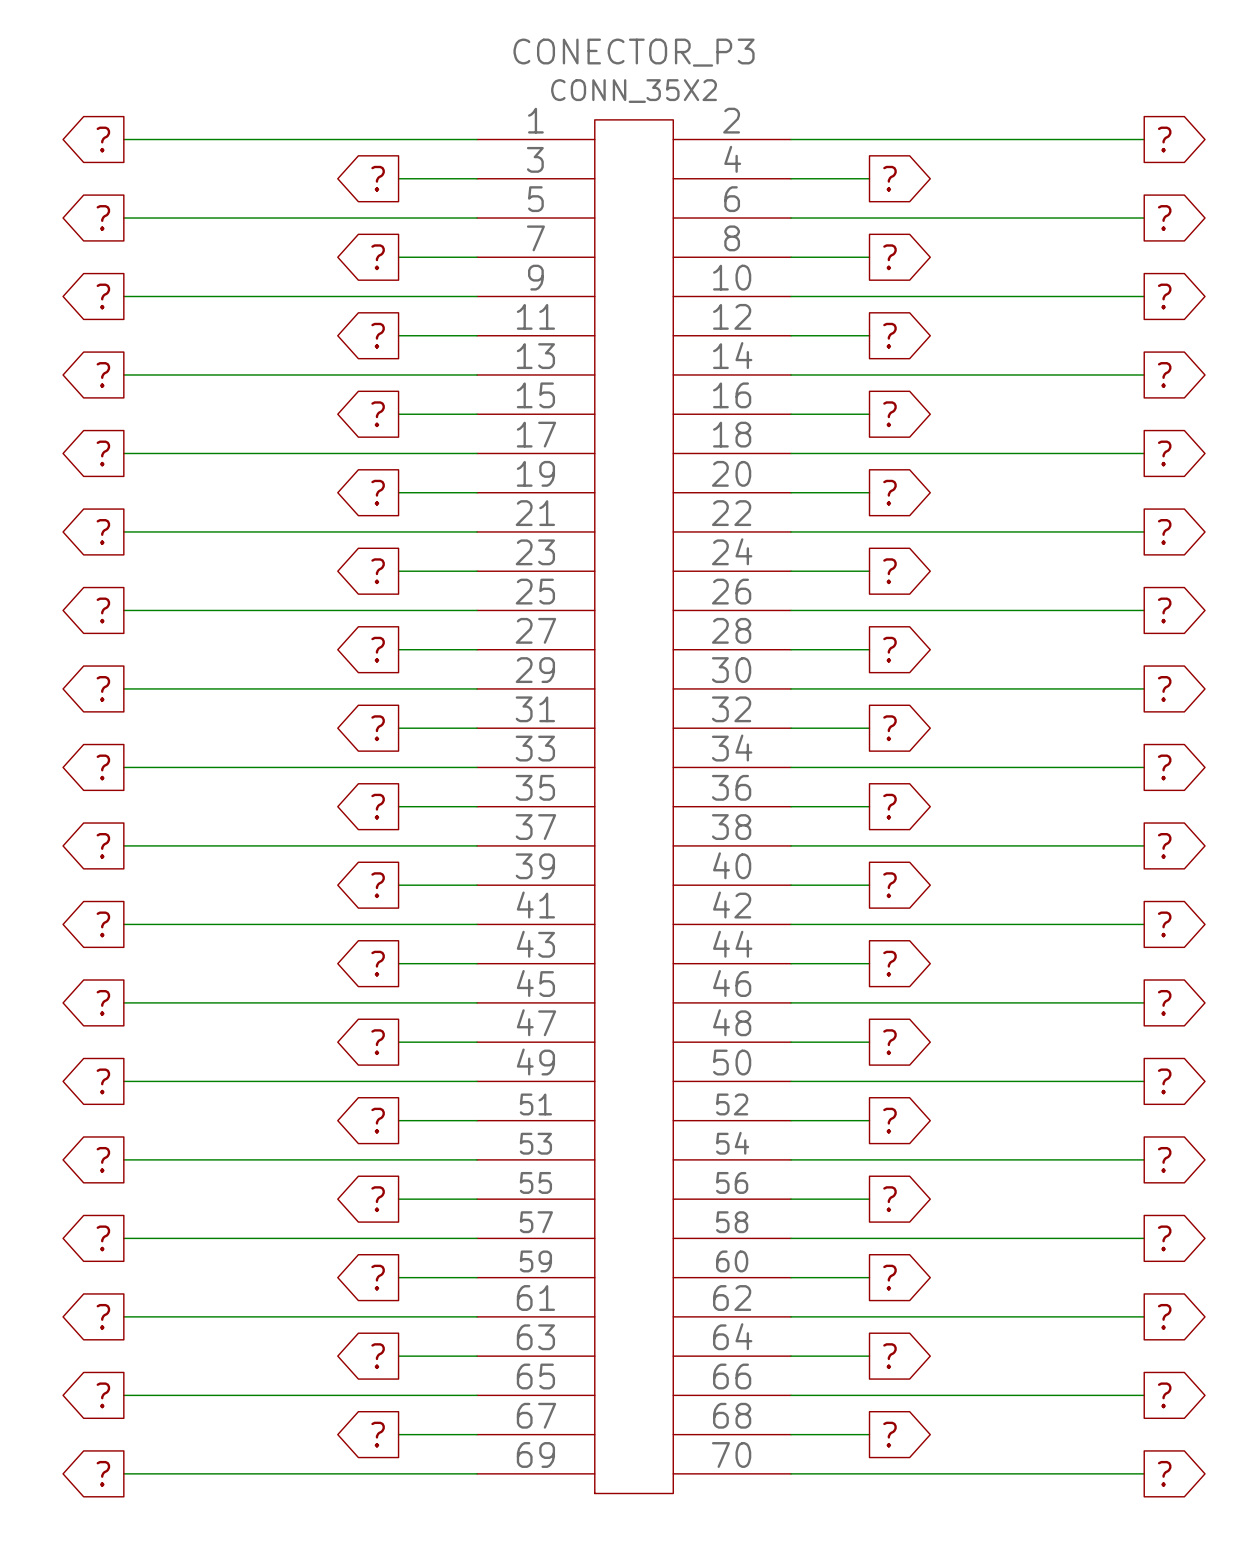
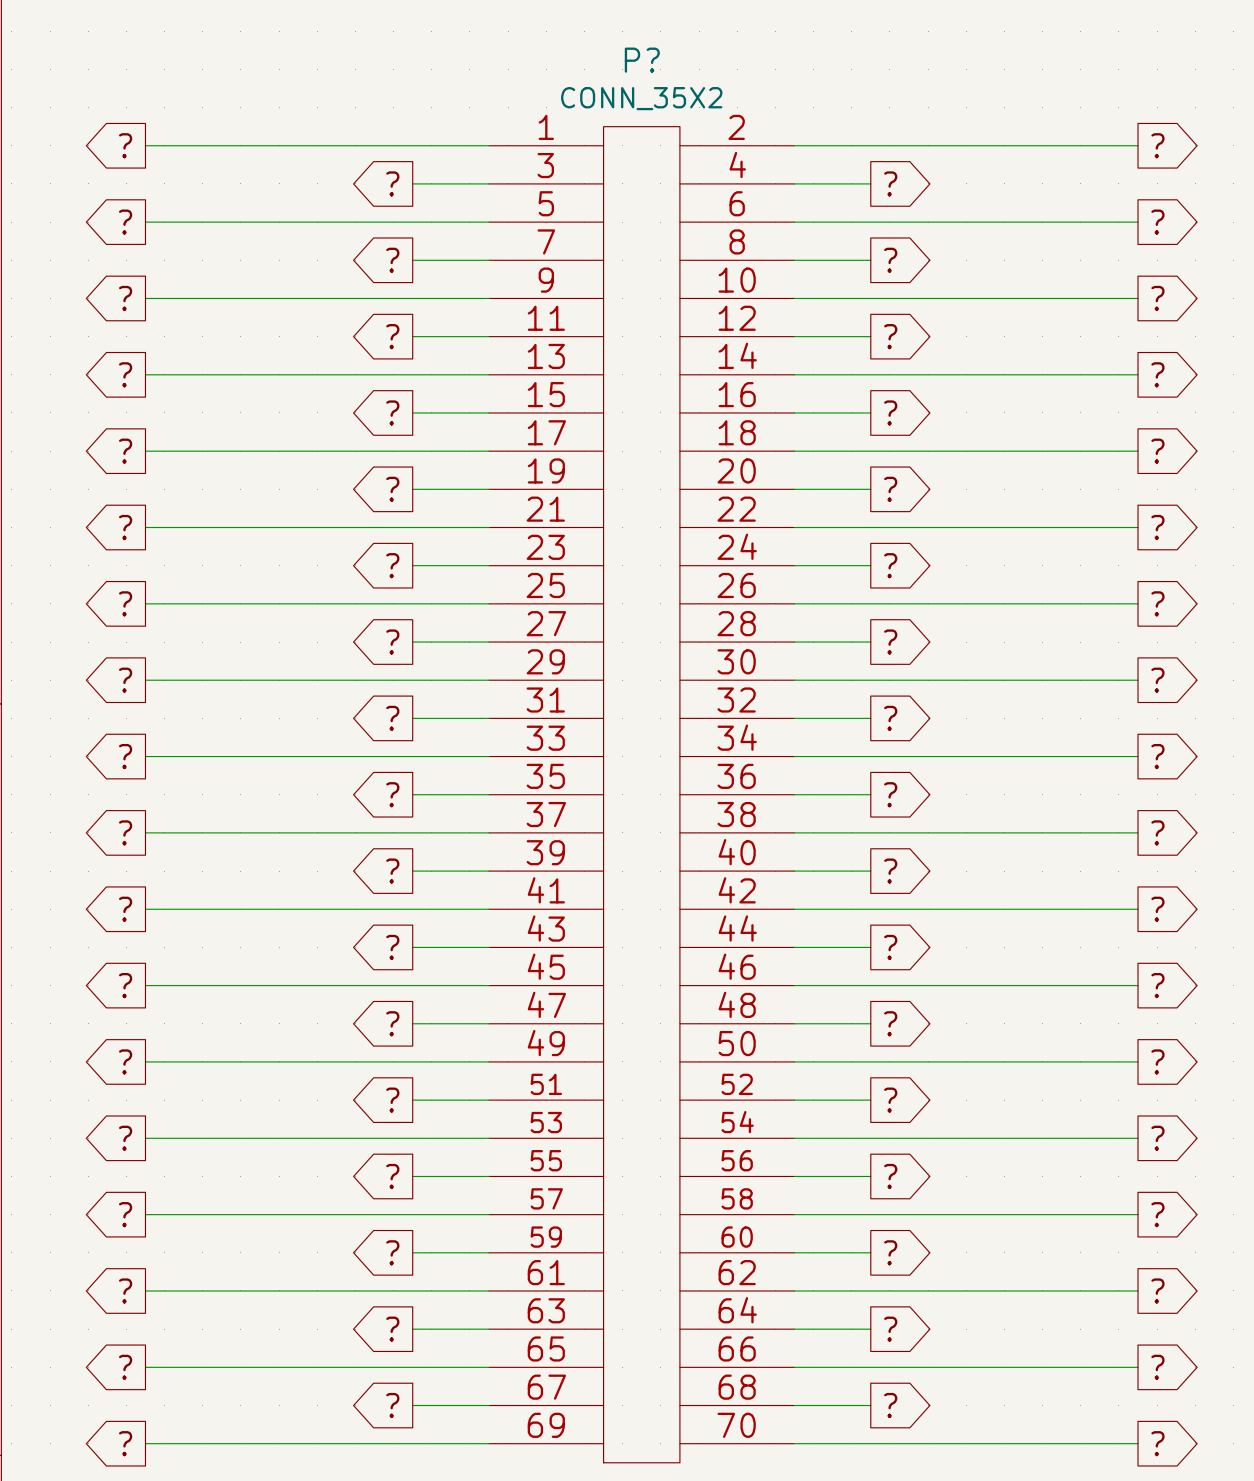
CONECTOR_P3 name: CONECTOR_P3 (634, 52) -> P? (642, 60)

